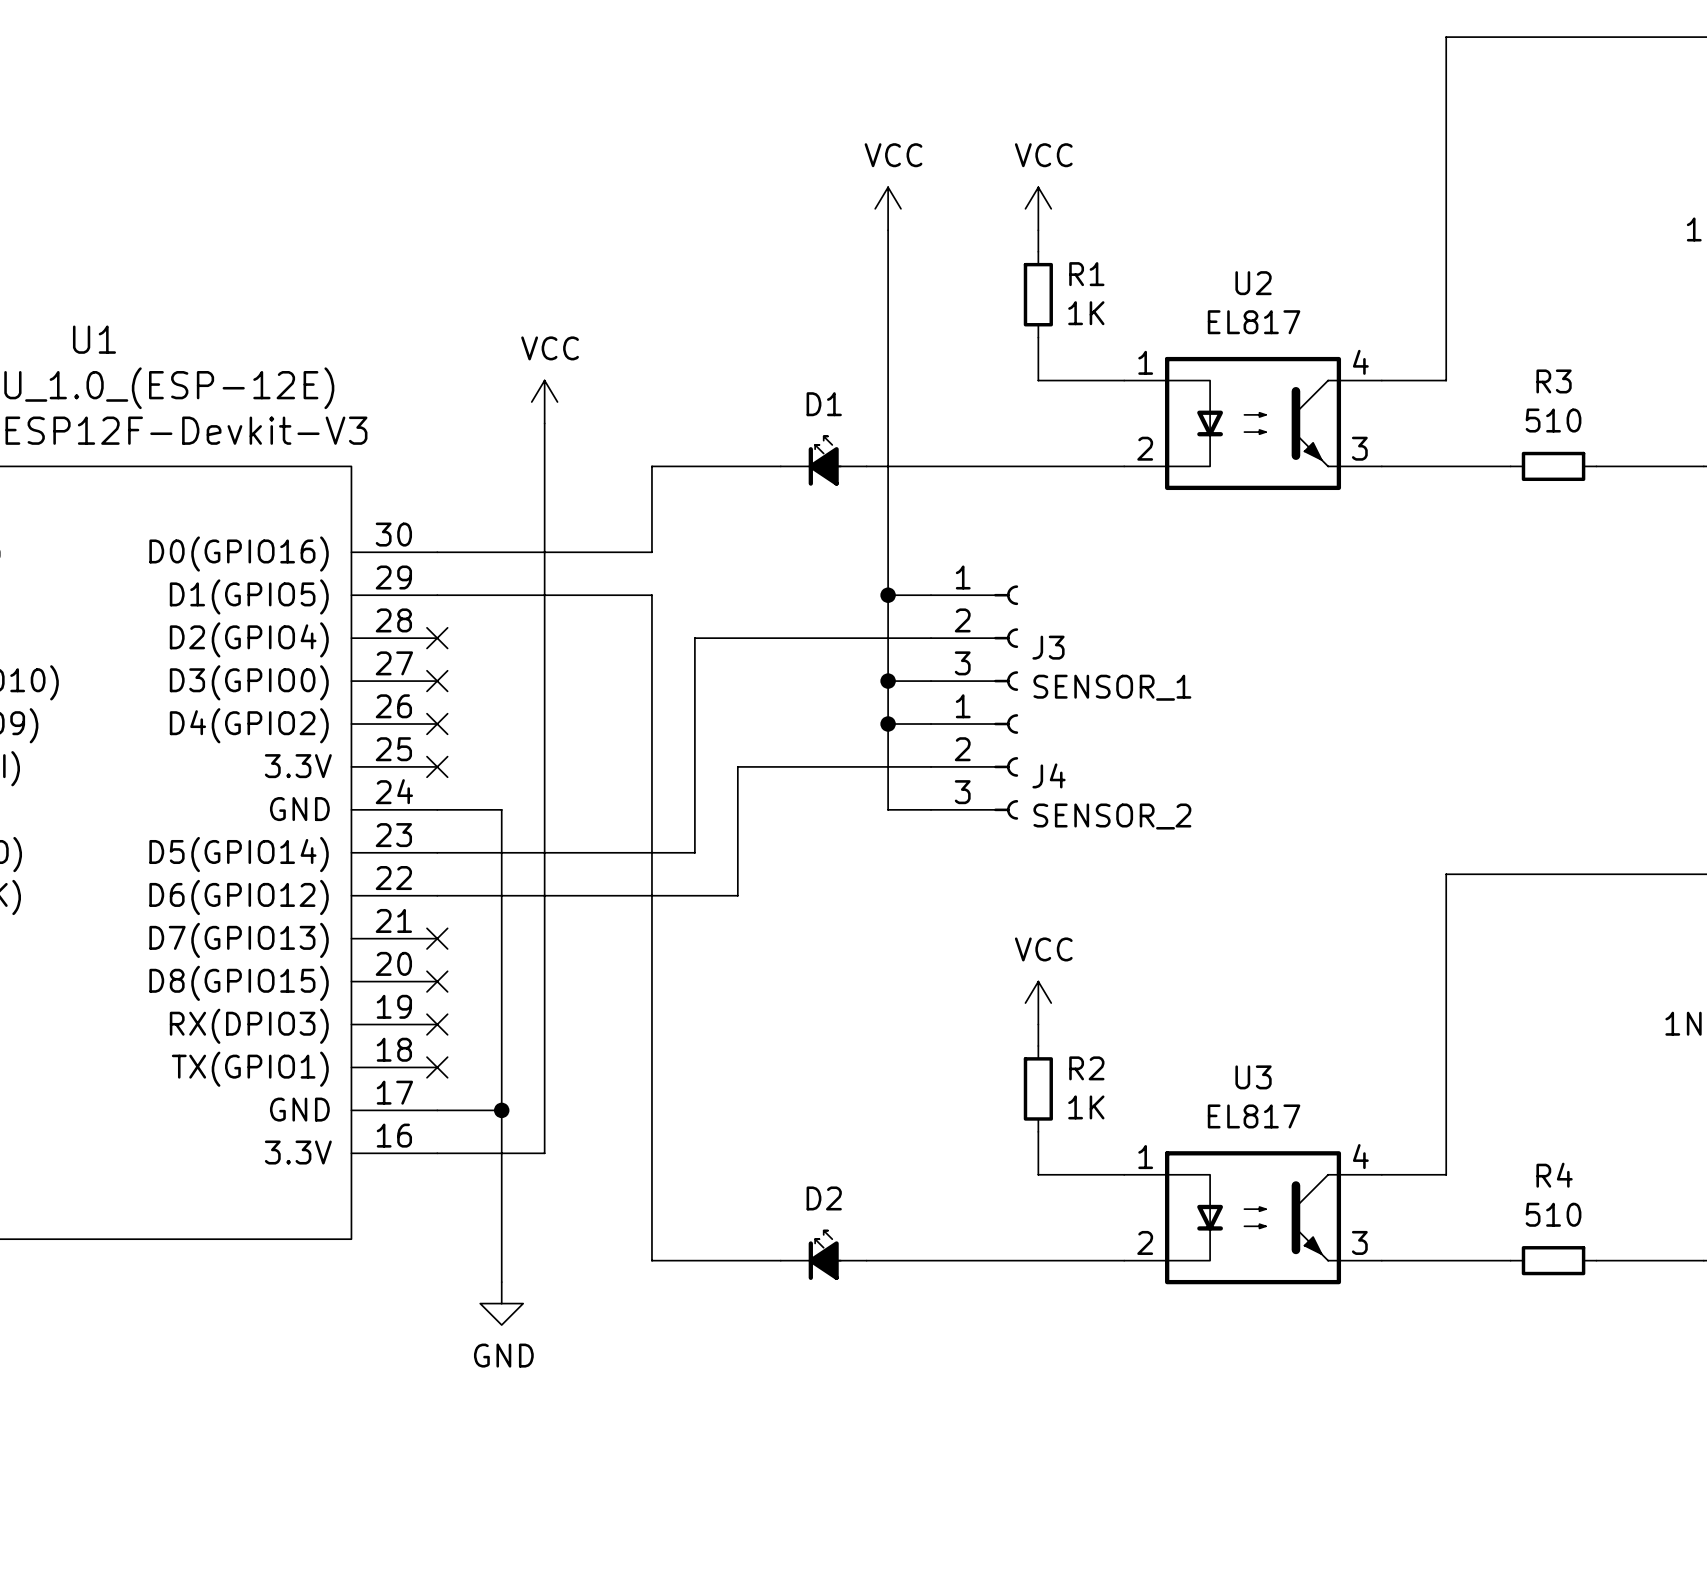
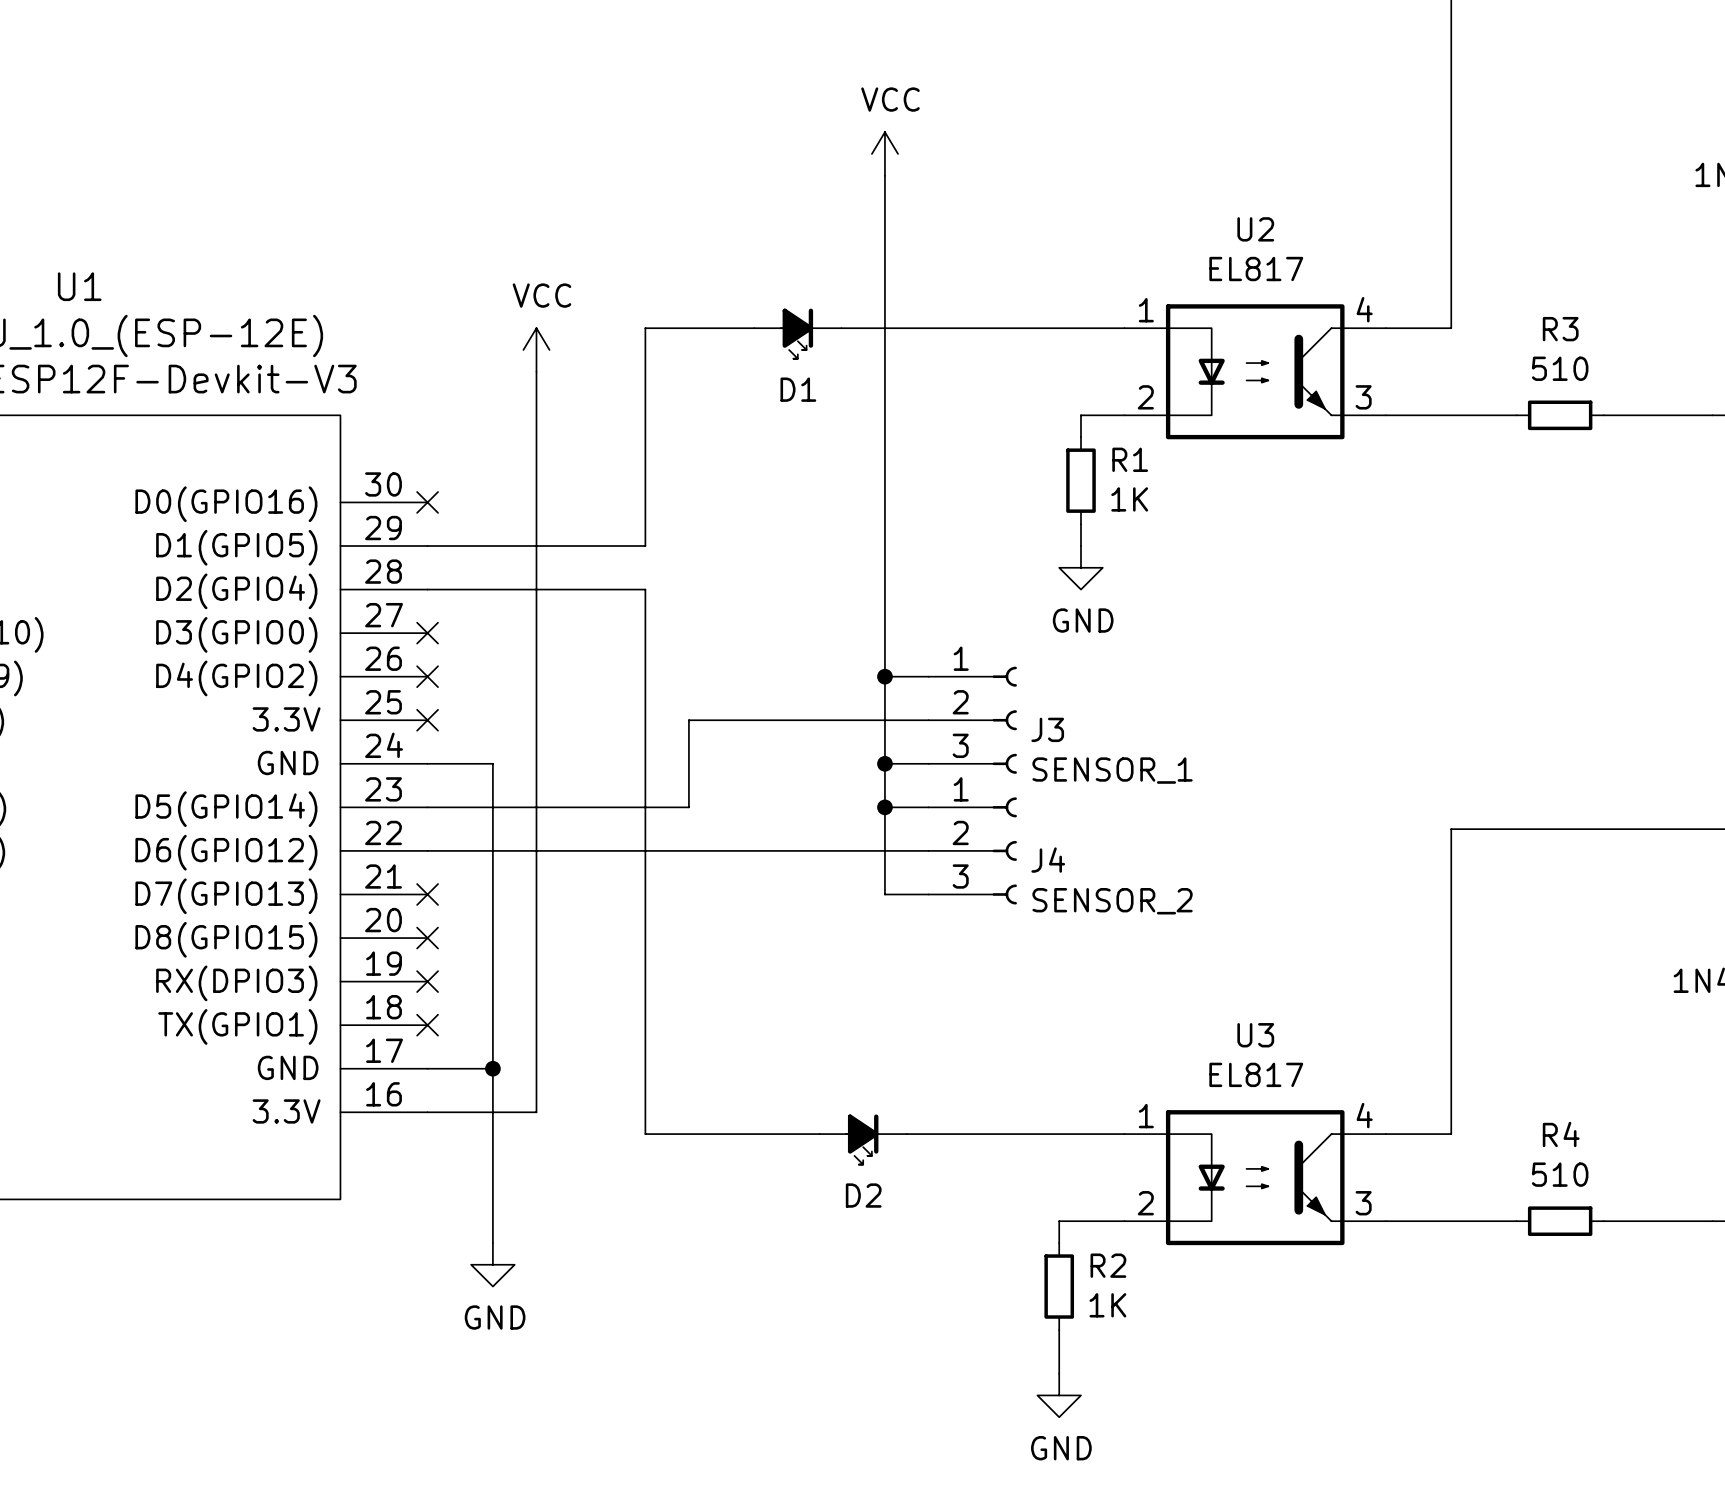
power symbol: VCC (1038, 208) -> none
wire: (1038, 230) (1038, 251) -> (1080, 524) (1080, 546)
R1 position: (1038, 294) -> (1080, 480)
wire: (1038, 337) (1038, 380) -> (841, 328) (1037, 328)
D1 position: (823, 461) -> (797, 333)
D1 rotation: 0° (824, 461) -> 180° (796, 333)
wire: (651, 466) (780, 466) -> (645, 415) (645, 328) (754, 328)
wire: (866, 466) (1081, 466) -> (1080, 437) (1080, 415)
wire: (437, 552) (651, 552) -> (427, 589) (645, 589)
wire: (651, 595) (651, 638) -> (645, 546) (645, 502)
wire: (888, 595) (931, 595) -> none
junction: (888, 595) -> none
power symbol: none -> GND (1080, 567)
no-connect mark position: (437, 638) -> (427, 502)
wire: (931, 638) (694, 638) (694, 766) -> none
J3: SENSOR_1 (974, 638) -> none
wire: (888, 681) (931, 681) -> (884, 807) (928, 807)
junction: (888, 681) -> none
wire: (737, 766) (737, 895) -> (732, 720) (688, 720)
J4 name: J4 (1049, 775) -> J3 (1047, 729)
wire: none -> (884, 763) (884, 894) (928, 894)
junction: none -> (884, 763)
J4 value: SENSOR_2 (1112, 816) -> SENSOR_1 (1112, 770)
junction: none -> (884, 807)
wire: none -> (732, 850) (928, 850)
J4: none -> SENSOR_2 (972, 850)
power symbol: VCC (1038, 1003) -> none
wire: (1038, 1024) (1038, 1045) -> none
R2 position: (1038, 1088) -> (1059, 1286)
wire: (1038, 1131) (1038, 1174) -> (906, 1134) (1037, 1134)
wire: (651, 1174) (651, 1260) (780, 1260) -> (645, 1134) (819, 1134)
D2 position: (823, 1255) -> (863, 1139)
D2 rotation: 0° (824, 1255) -> 180° (862, 1139)
wire: (866, 1260) (1059, 1260) -> (1059, 1242) (1059, 1221)
wire: none -> (1059, 1330) (1059, 1373)
power symbol: none -> GND (1059, 1395)

